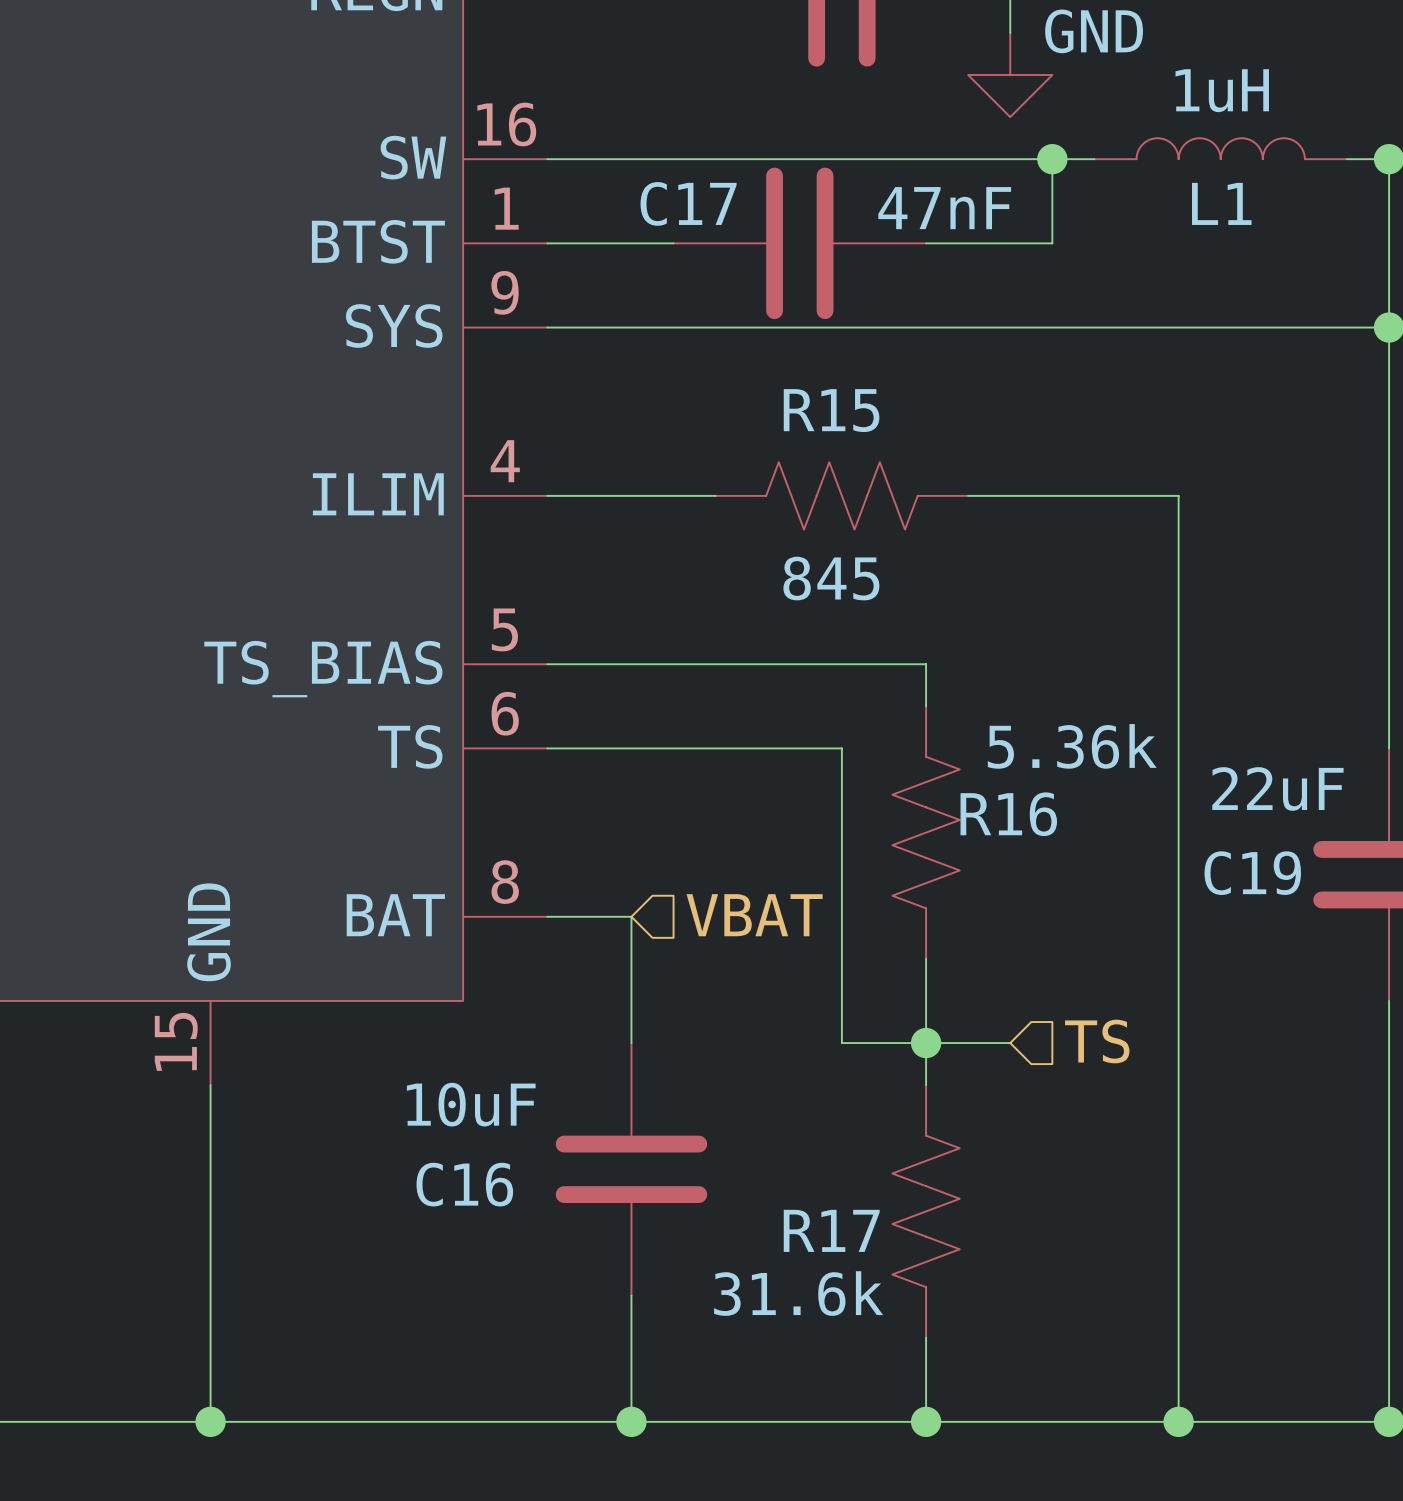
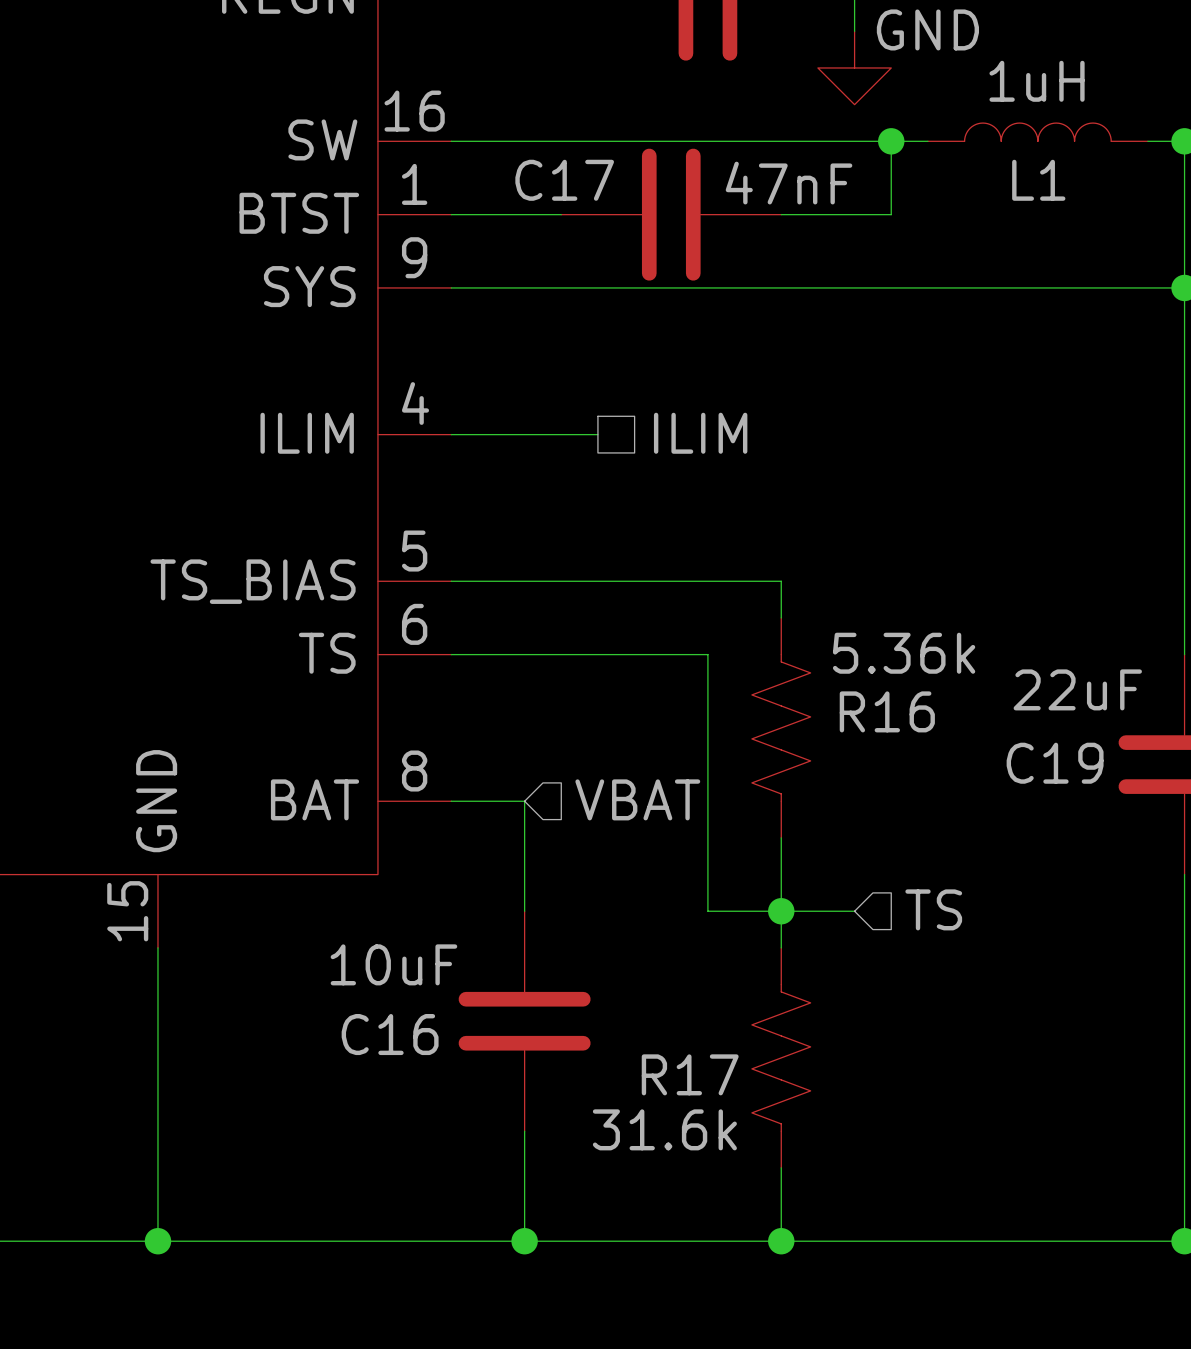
hierarchical label: none -> ILIM (700, 433)
R15: 845 (841, 495) -> none
wire: (968, 495) (1178, 495) (1178, 1421) -> none
R16 name position: R16 (1008, 814) -> R16 (887, 711)
junction: (1178, 1421) -> none

